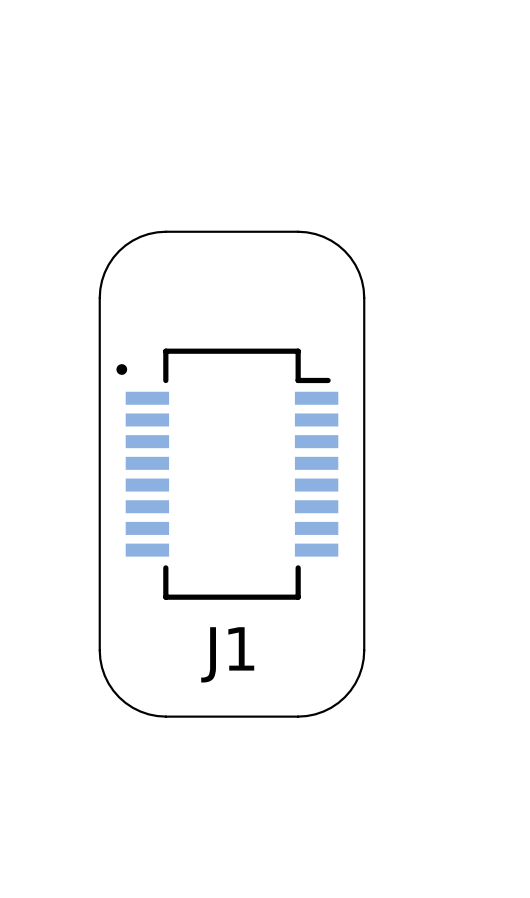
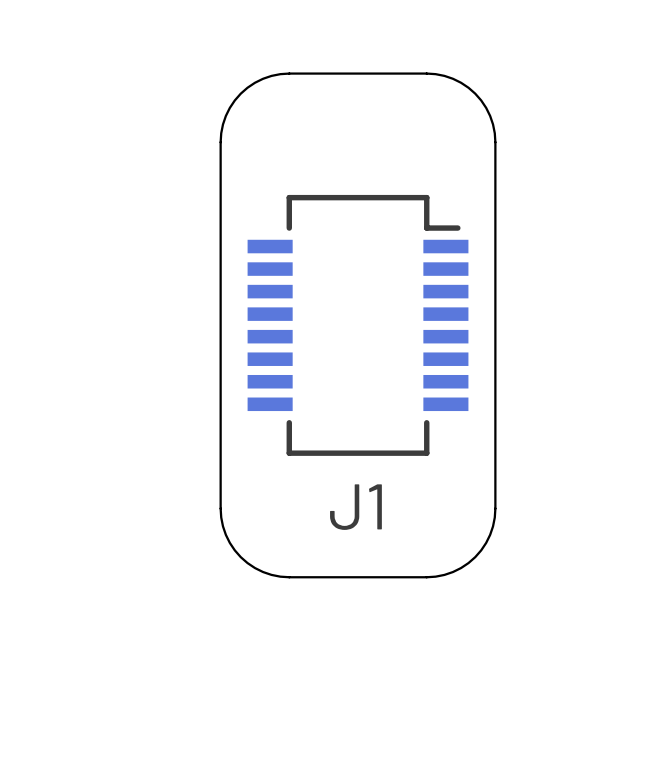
drawing: [116, 364, 128, 375] -> none

